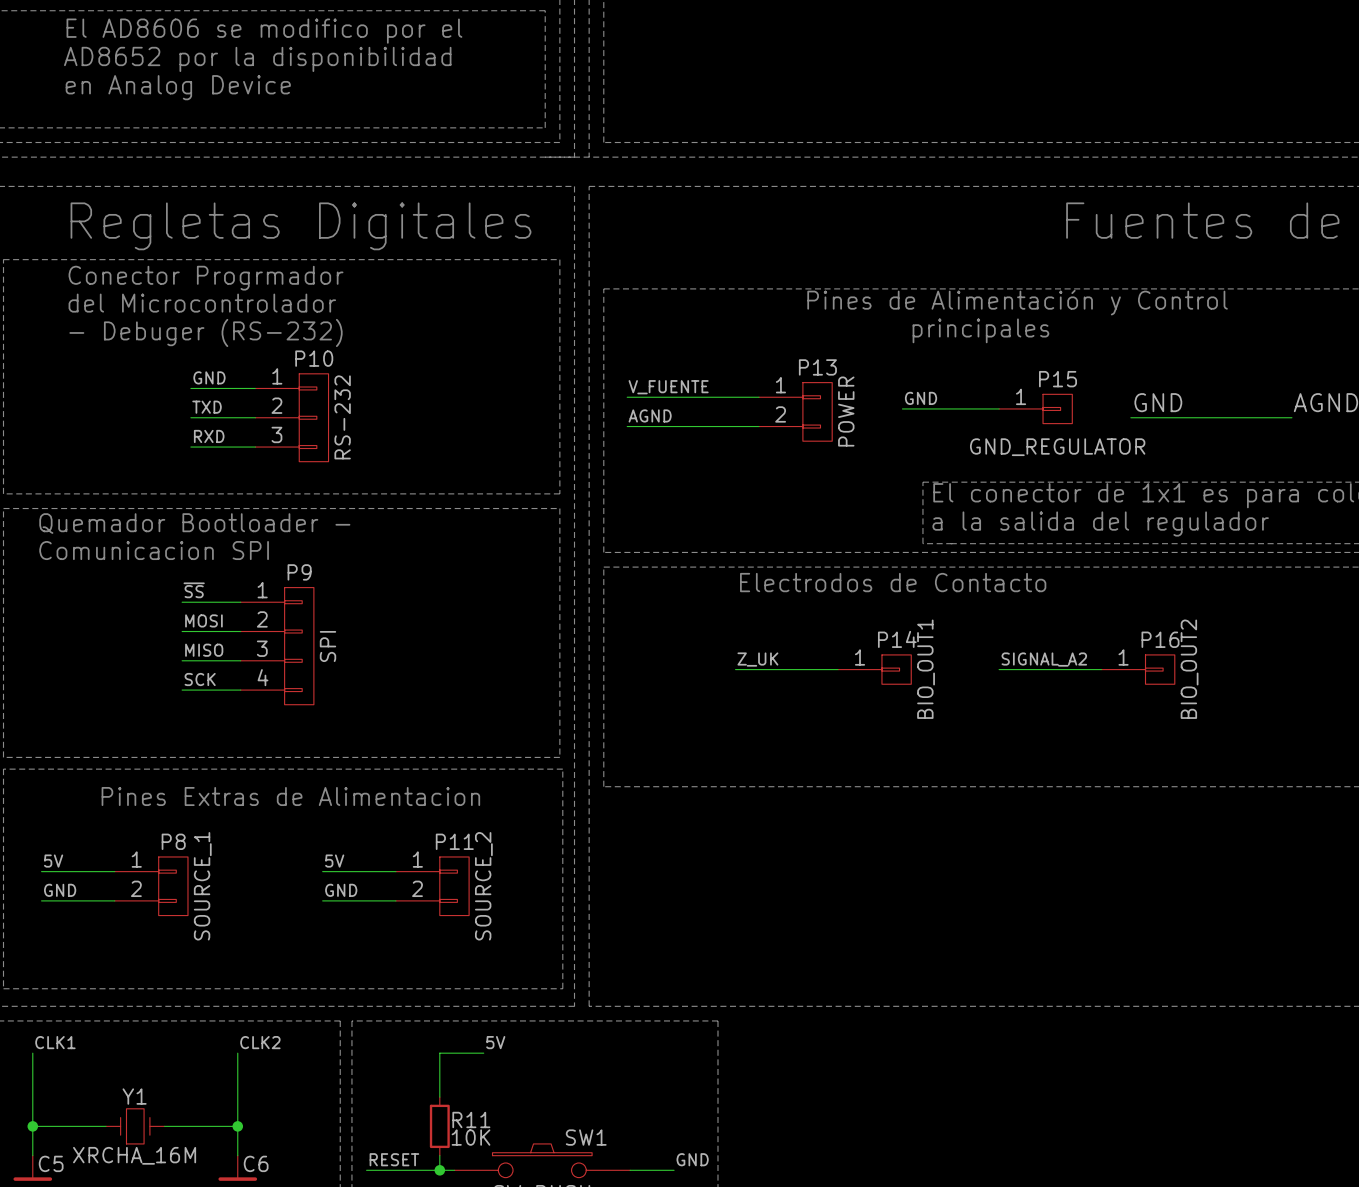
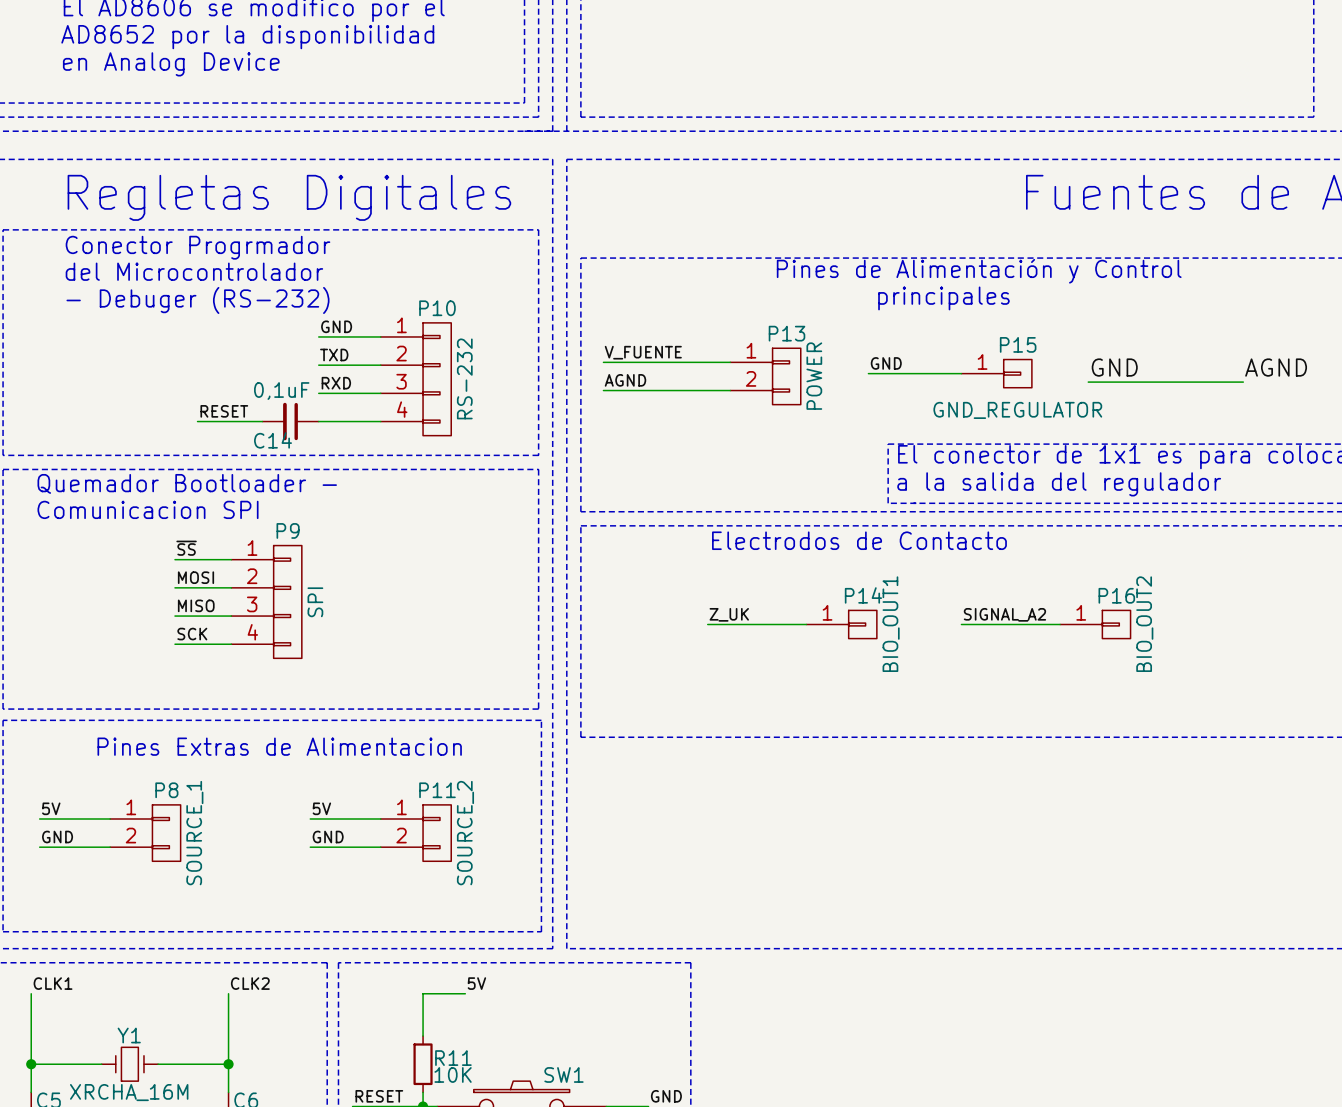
wire: none -> (318, 336) (380, 336)
P10 symbol: [255, 373, 329, 462] -> [380, 322, 452, 436]
label position: GND (209, 377) -> GND (336, 326)
wire: (190, 388) (255, 388) -> (318, 365) (380, 365)
label position: TXD (207, 407) -> TXD (334, 354)
wire: (190, 417) (255, 417) -> (318, 393) (380, 393)
label position: RXD (209, 436) -> RXD (336, 383)
wire: (190, 447) (255, 447) -> (318, 421) (380, 421)
label: none -> RESET (224, 411)
wire: none -> (197, 421) (262, 421)
C14: none -> 0,1uF (290, 421)

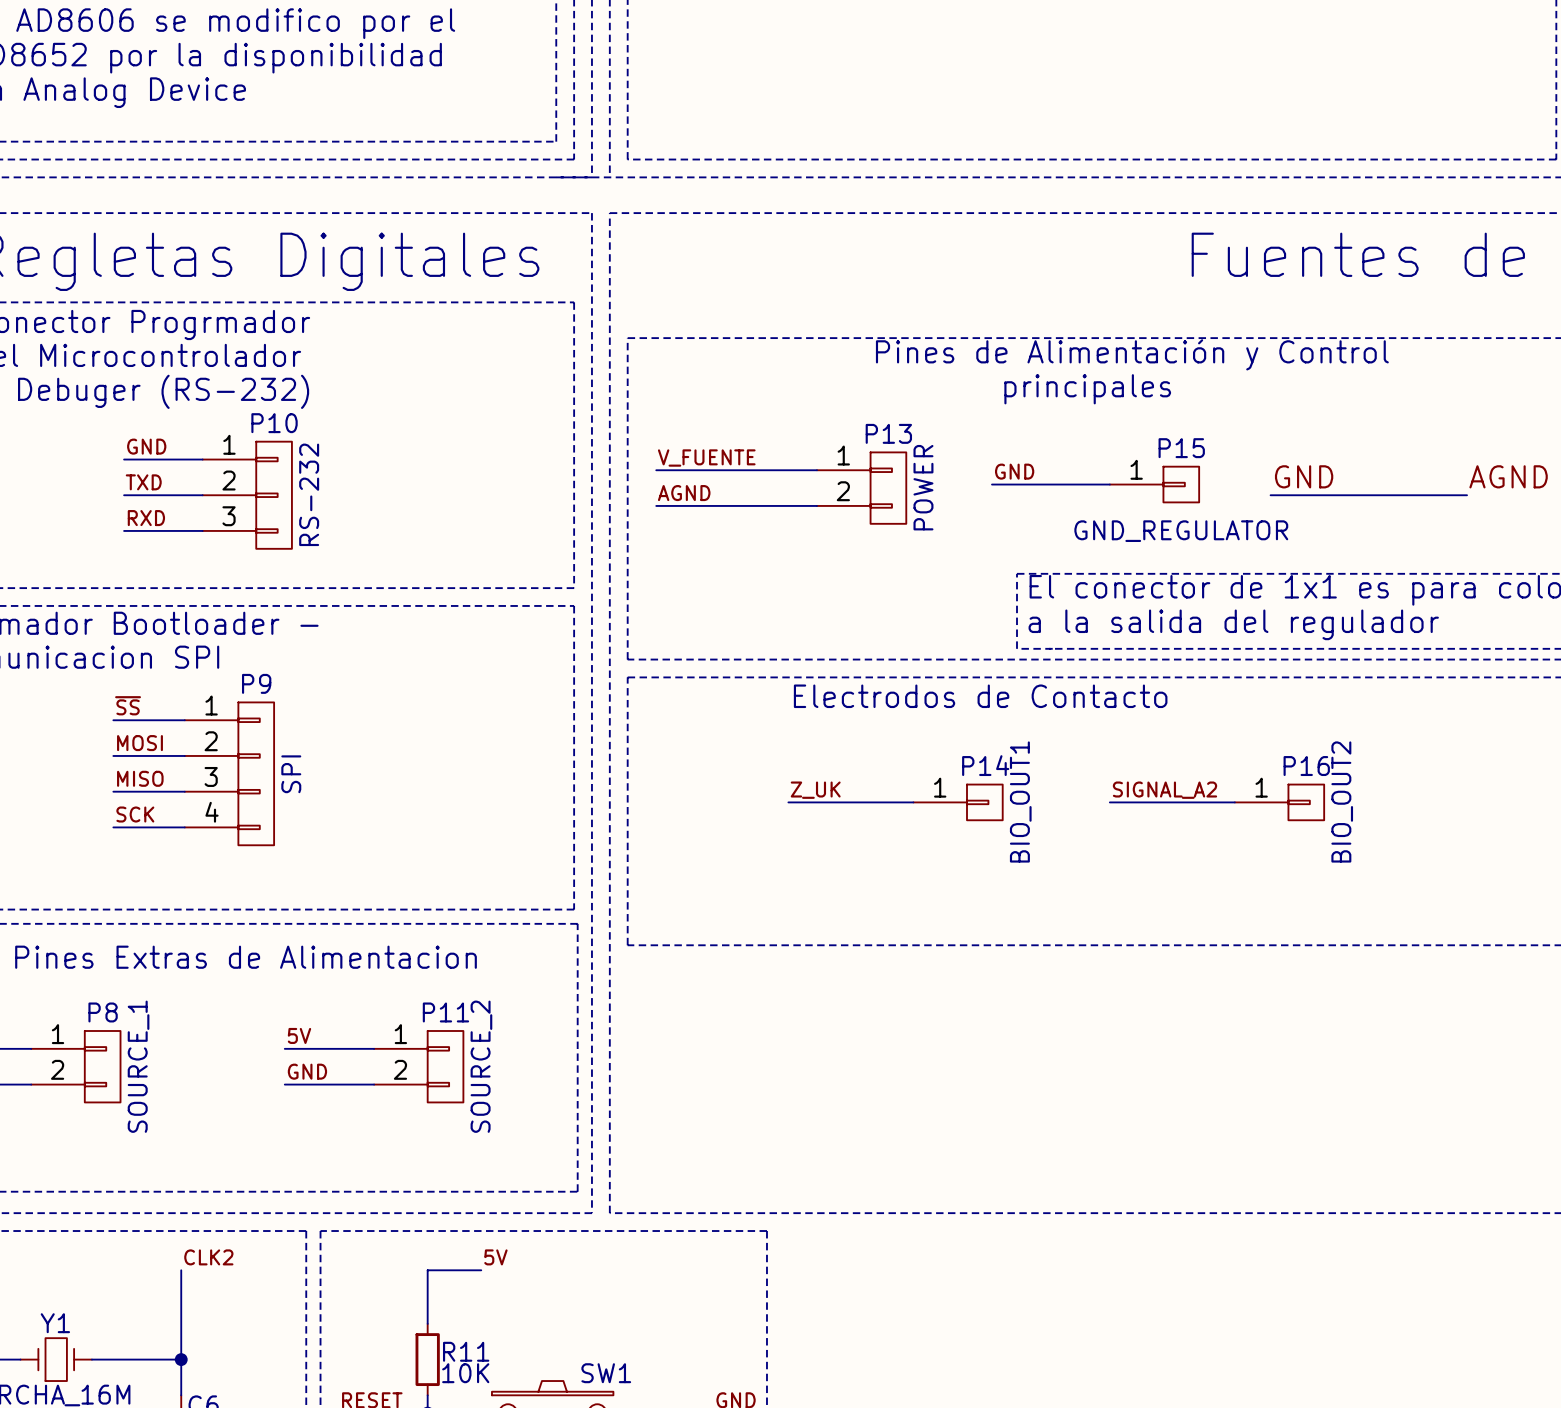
P10 symbol: [380, 322, 452, 436] -> [202, 441, 292, 549]
label position: GND (336, 326) -> GND (146, 446)
wire: (318, 336) (380, 336) -> none
label position: TXD (334, 354) -> TXD (143, 482)
wire: (318, 365) (380, 365) -> (124, 459) (202, 459)
label position: RXD (336, 383) -> RXD (146, 518)
wire: (318, 393) (380, 393) -> (124, 495) (202, 495)
label: RESET (224, 411) -> none
wire: (197, 421) (262, 421) -> none
C14: 0,1uF (290, 421) -> none
wire: (318, 421) (380, 421) -> (124, 530) (202, 530)

